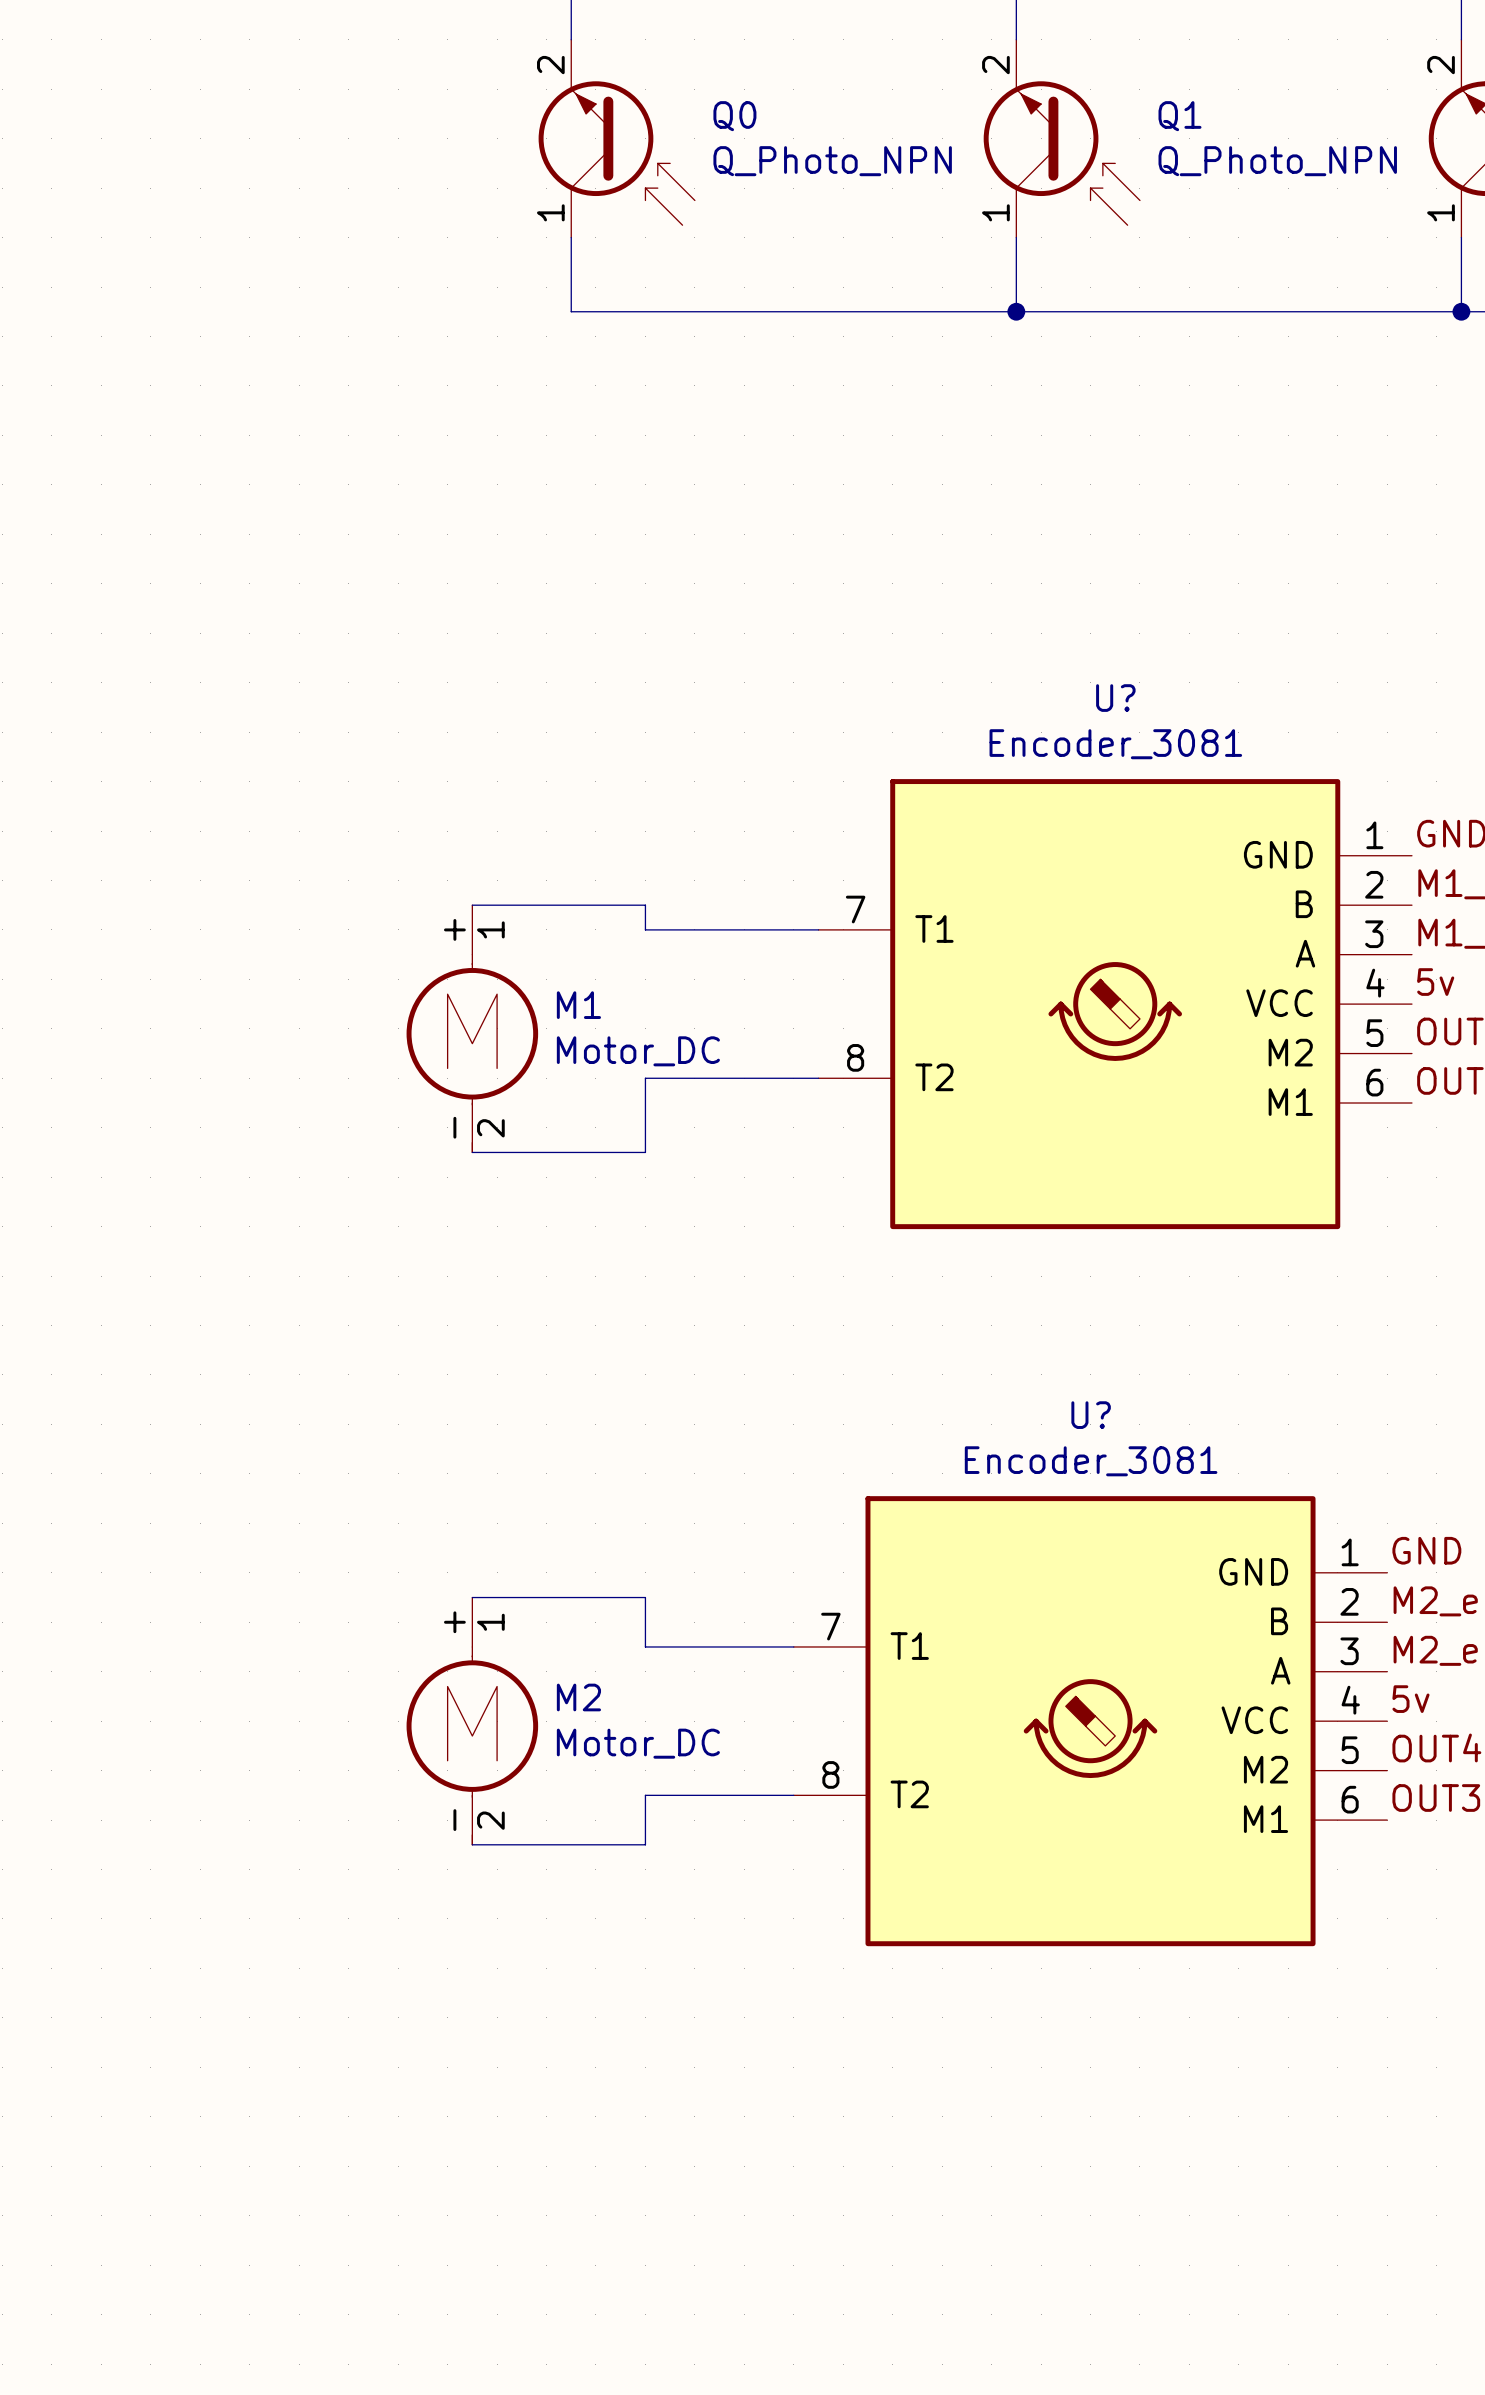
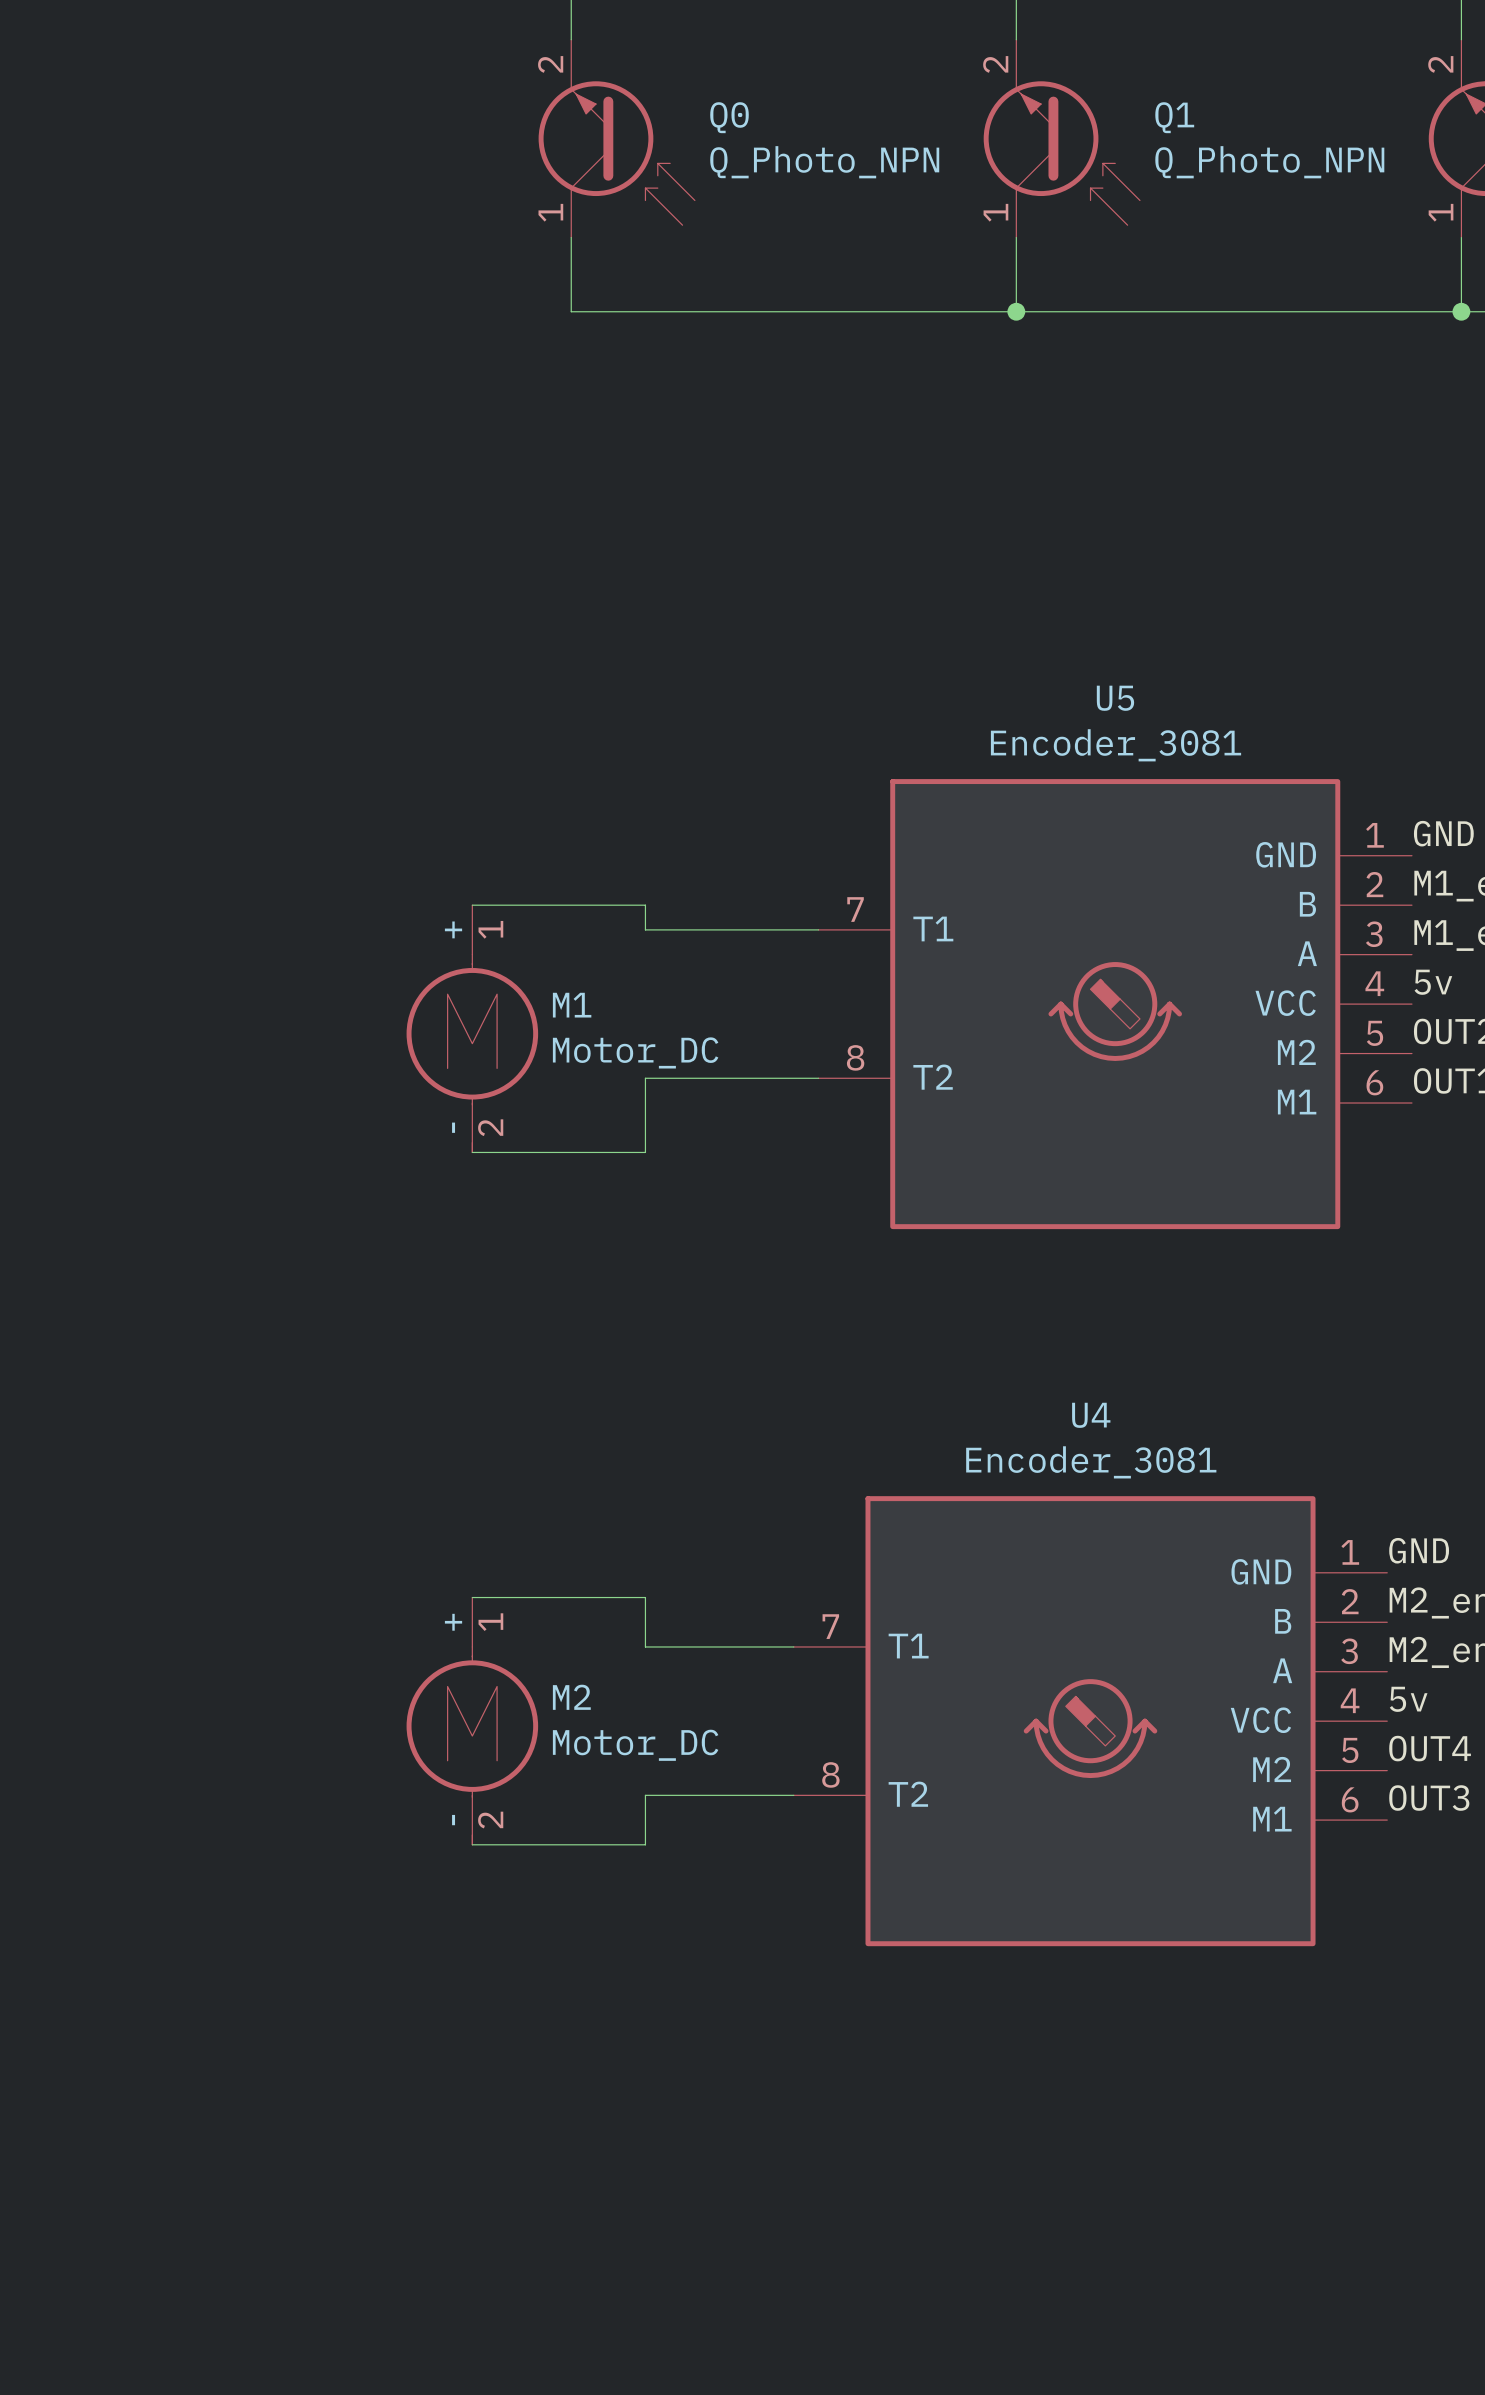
U? name: U? (1115, 698) -> U5 (1115, 698)
U? name: U? (1091, 1415) -> U4 (1091, 1415)

